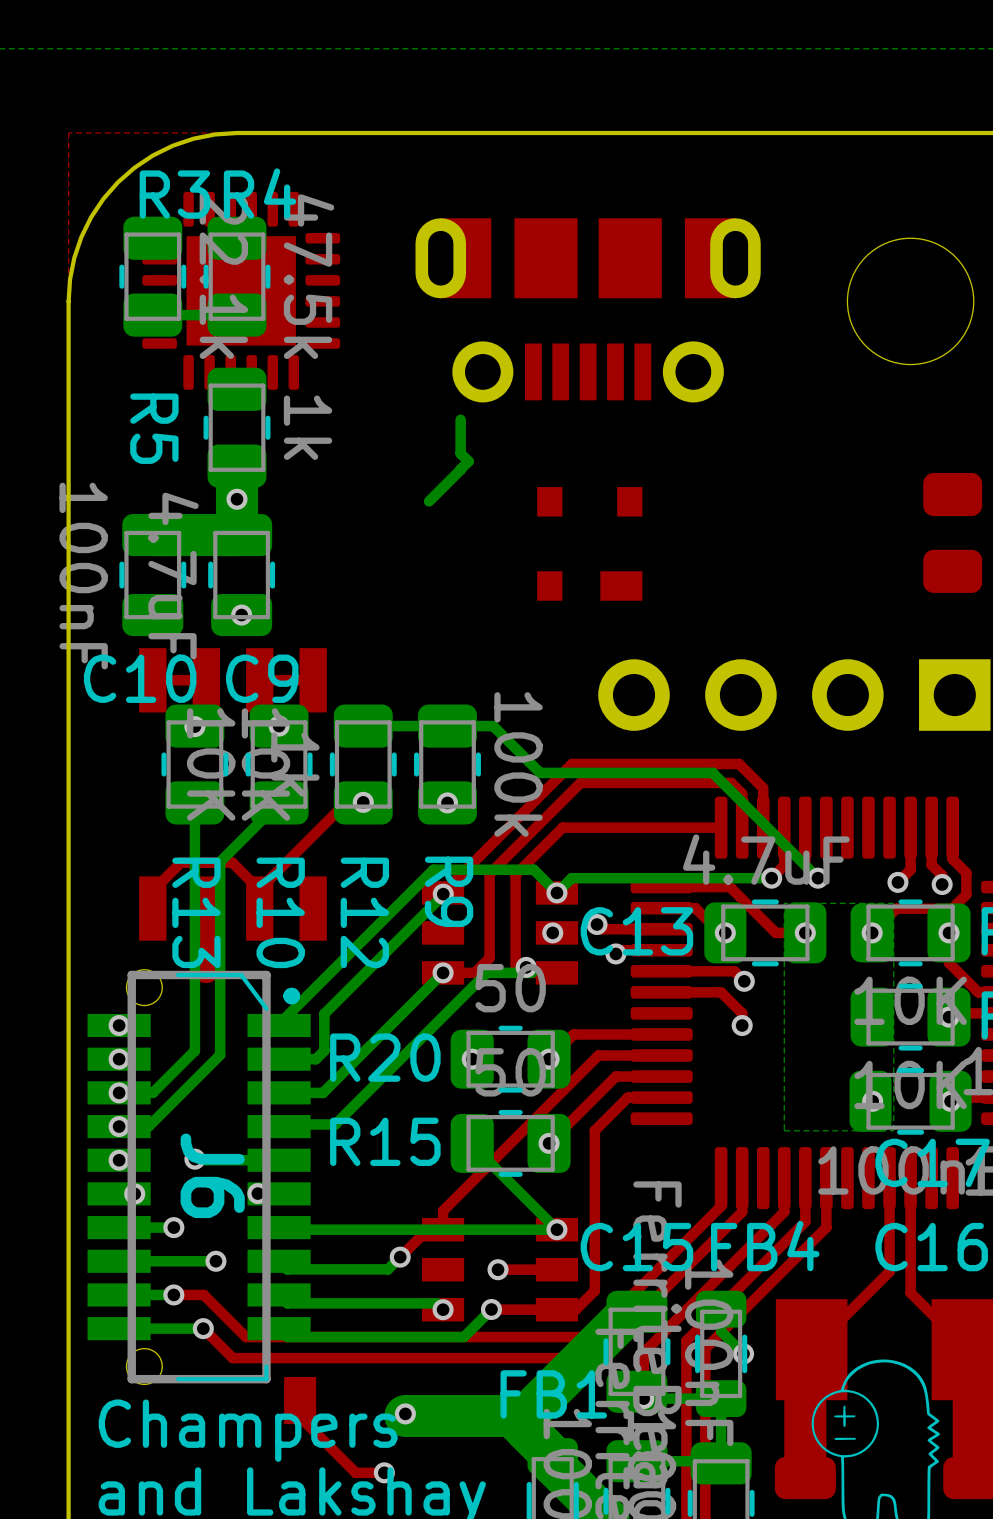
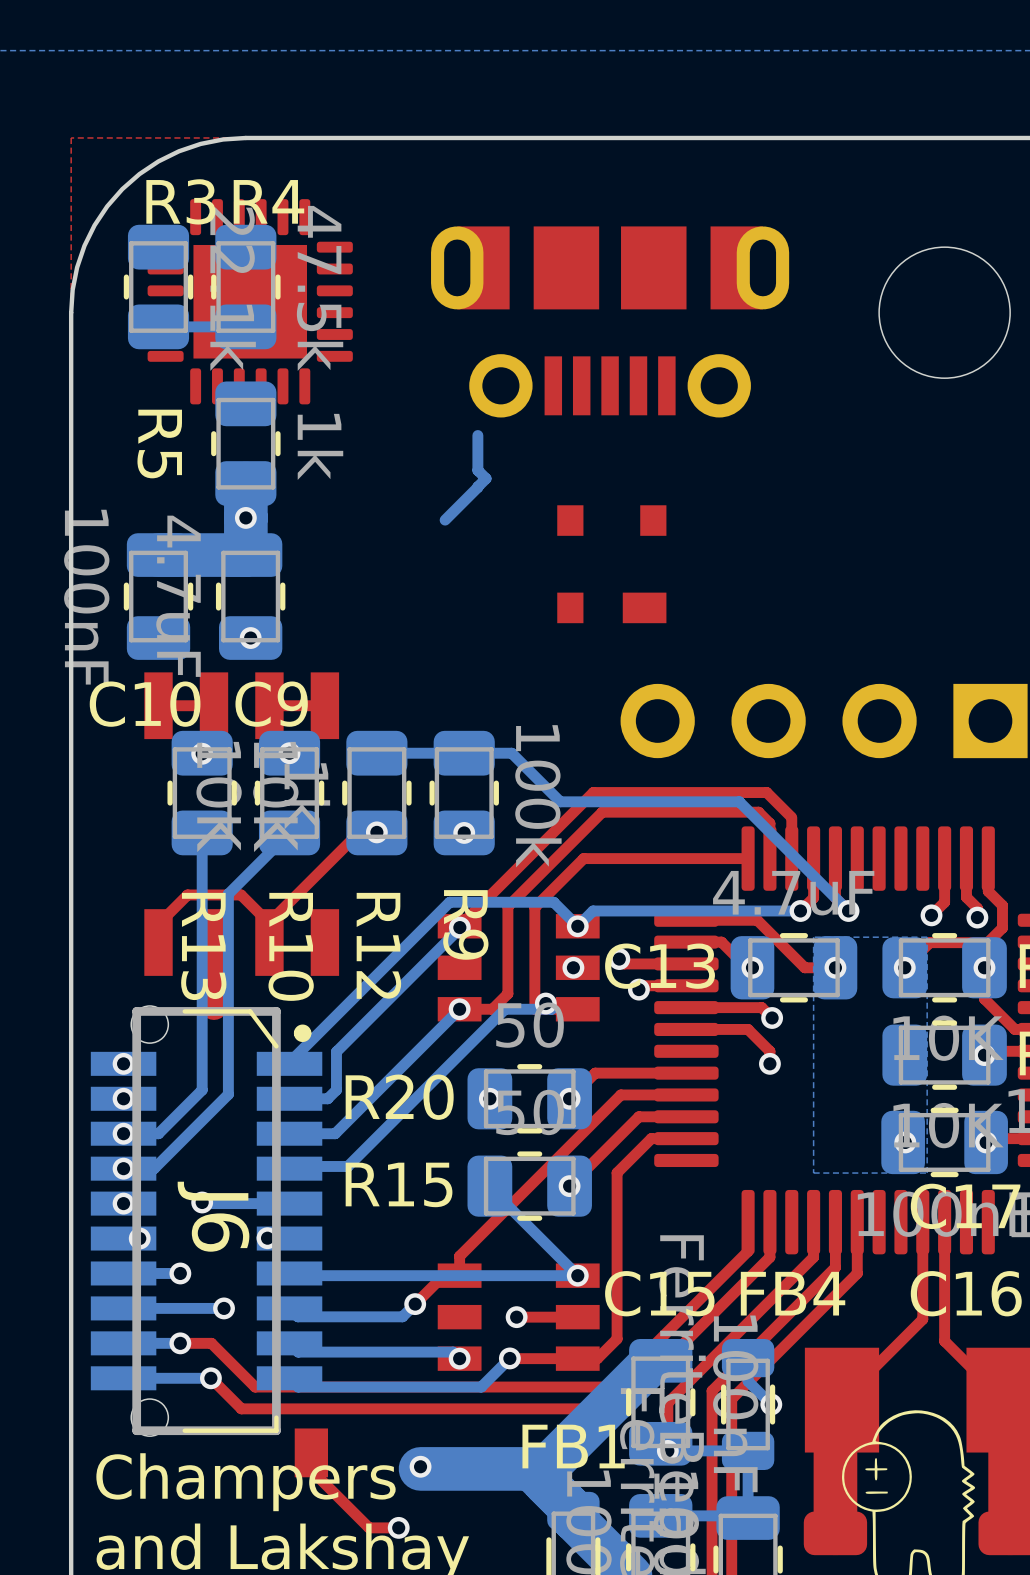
part: (952, 532) -> none

